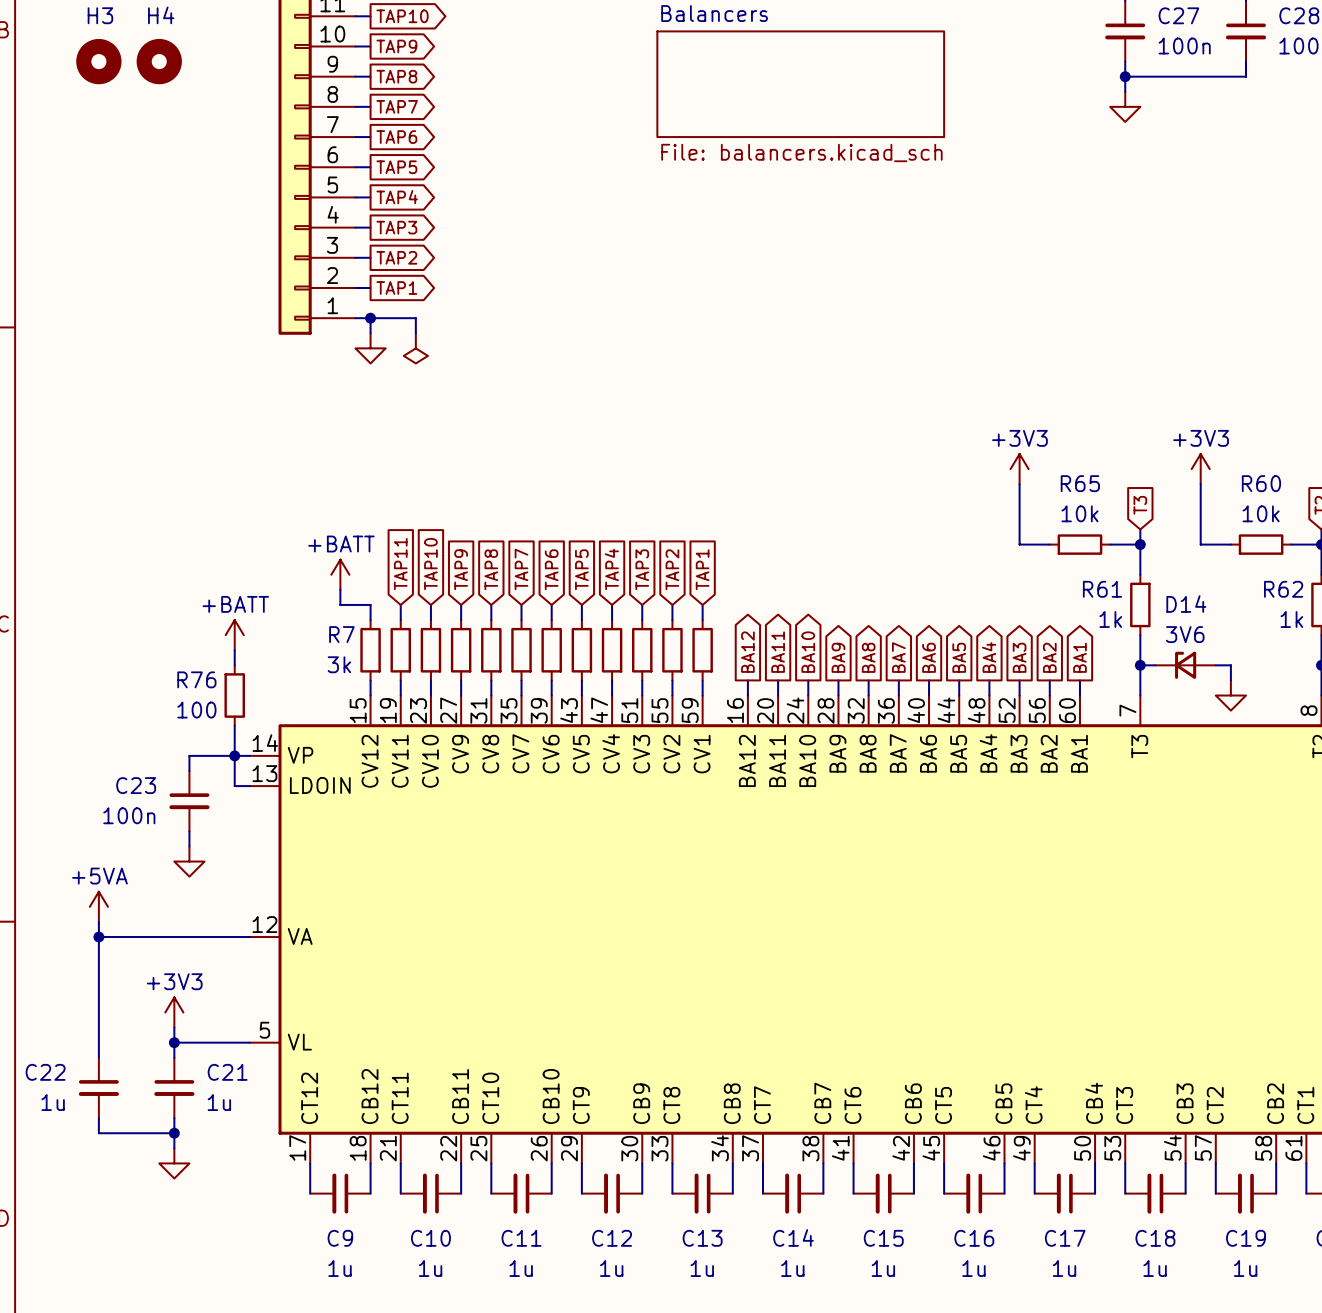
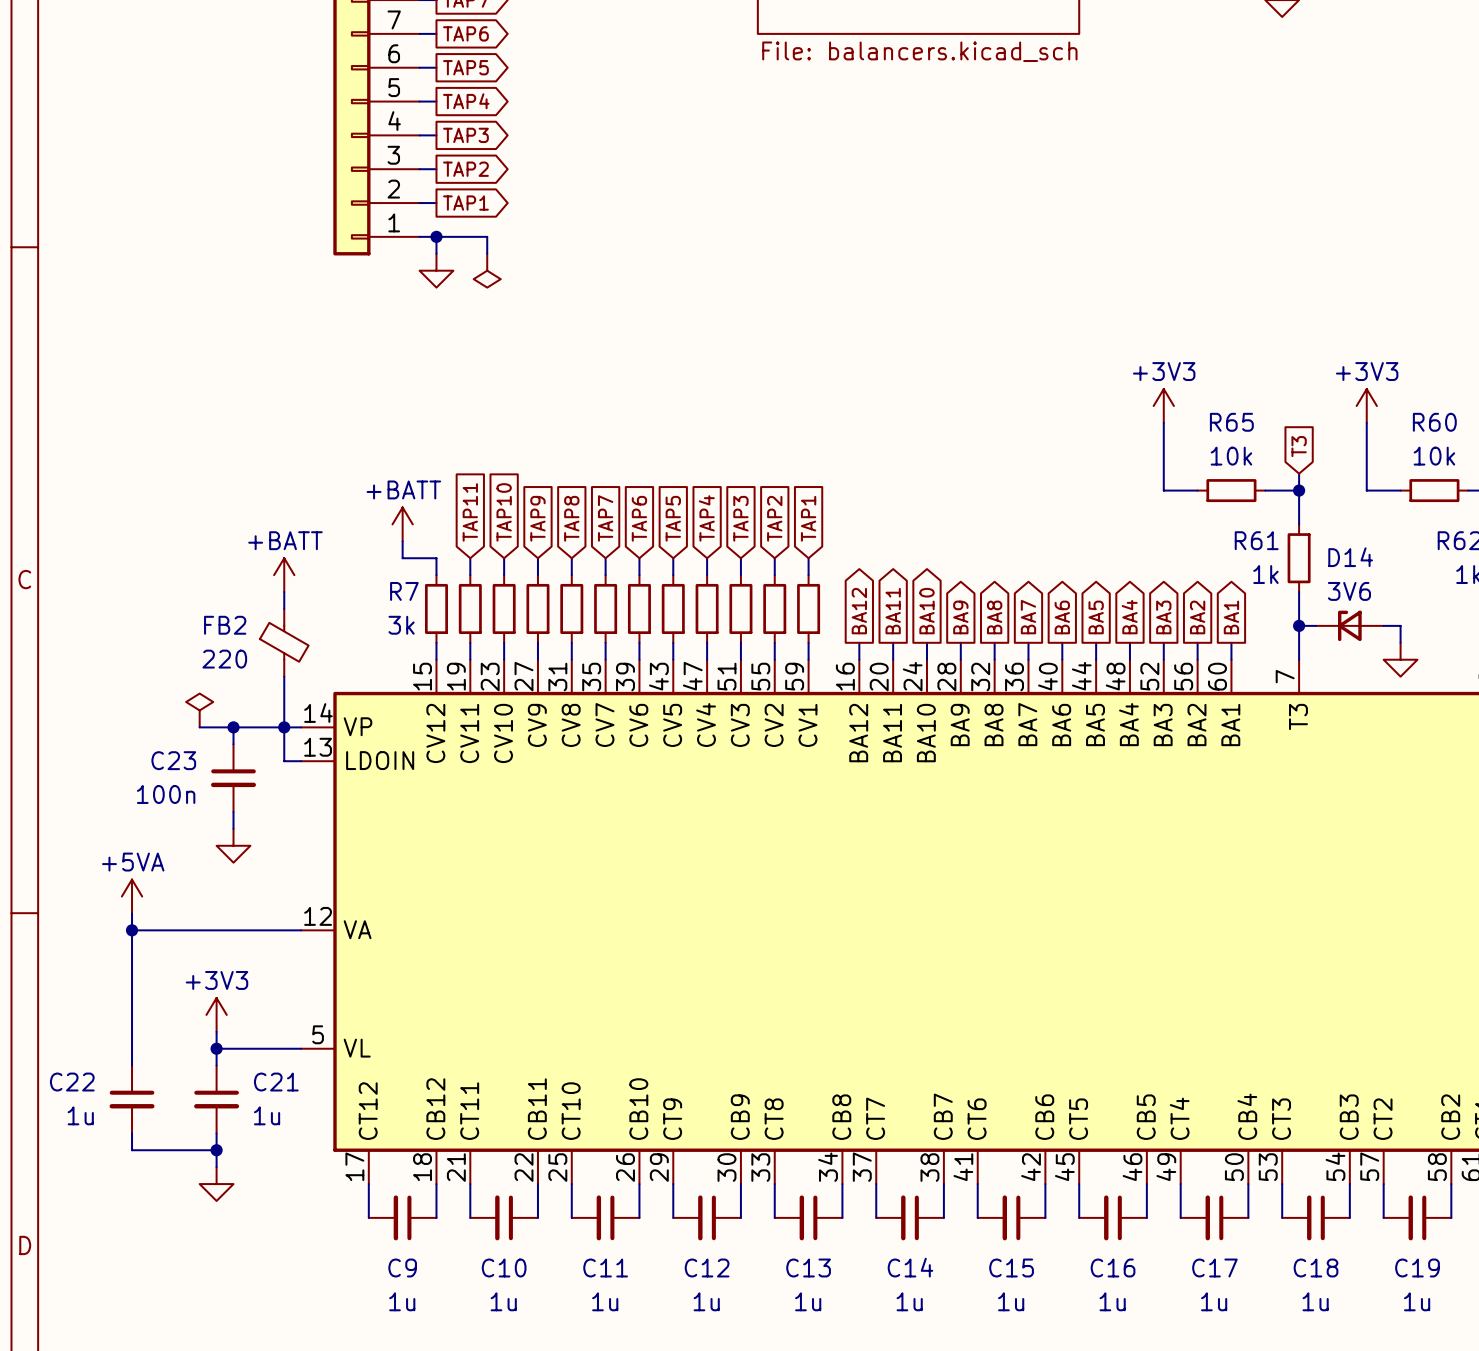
power symbol position: +BATT (234, 635) -> +BATT (284, 575)
FB2: none -> 220 (284, 642)
R76: 100 (234, 695) -> none
power symbol: none -> (199, 710)
wire: none -> (199, 727) (233, 727)
junction: none -> (233, 727)

